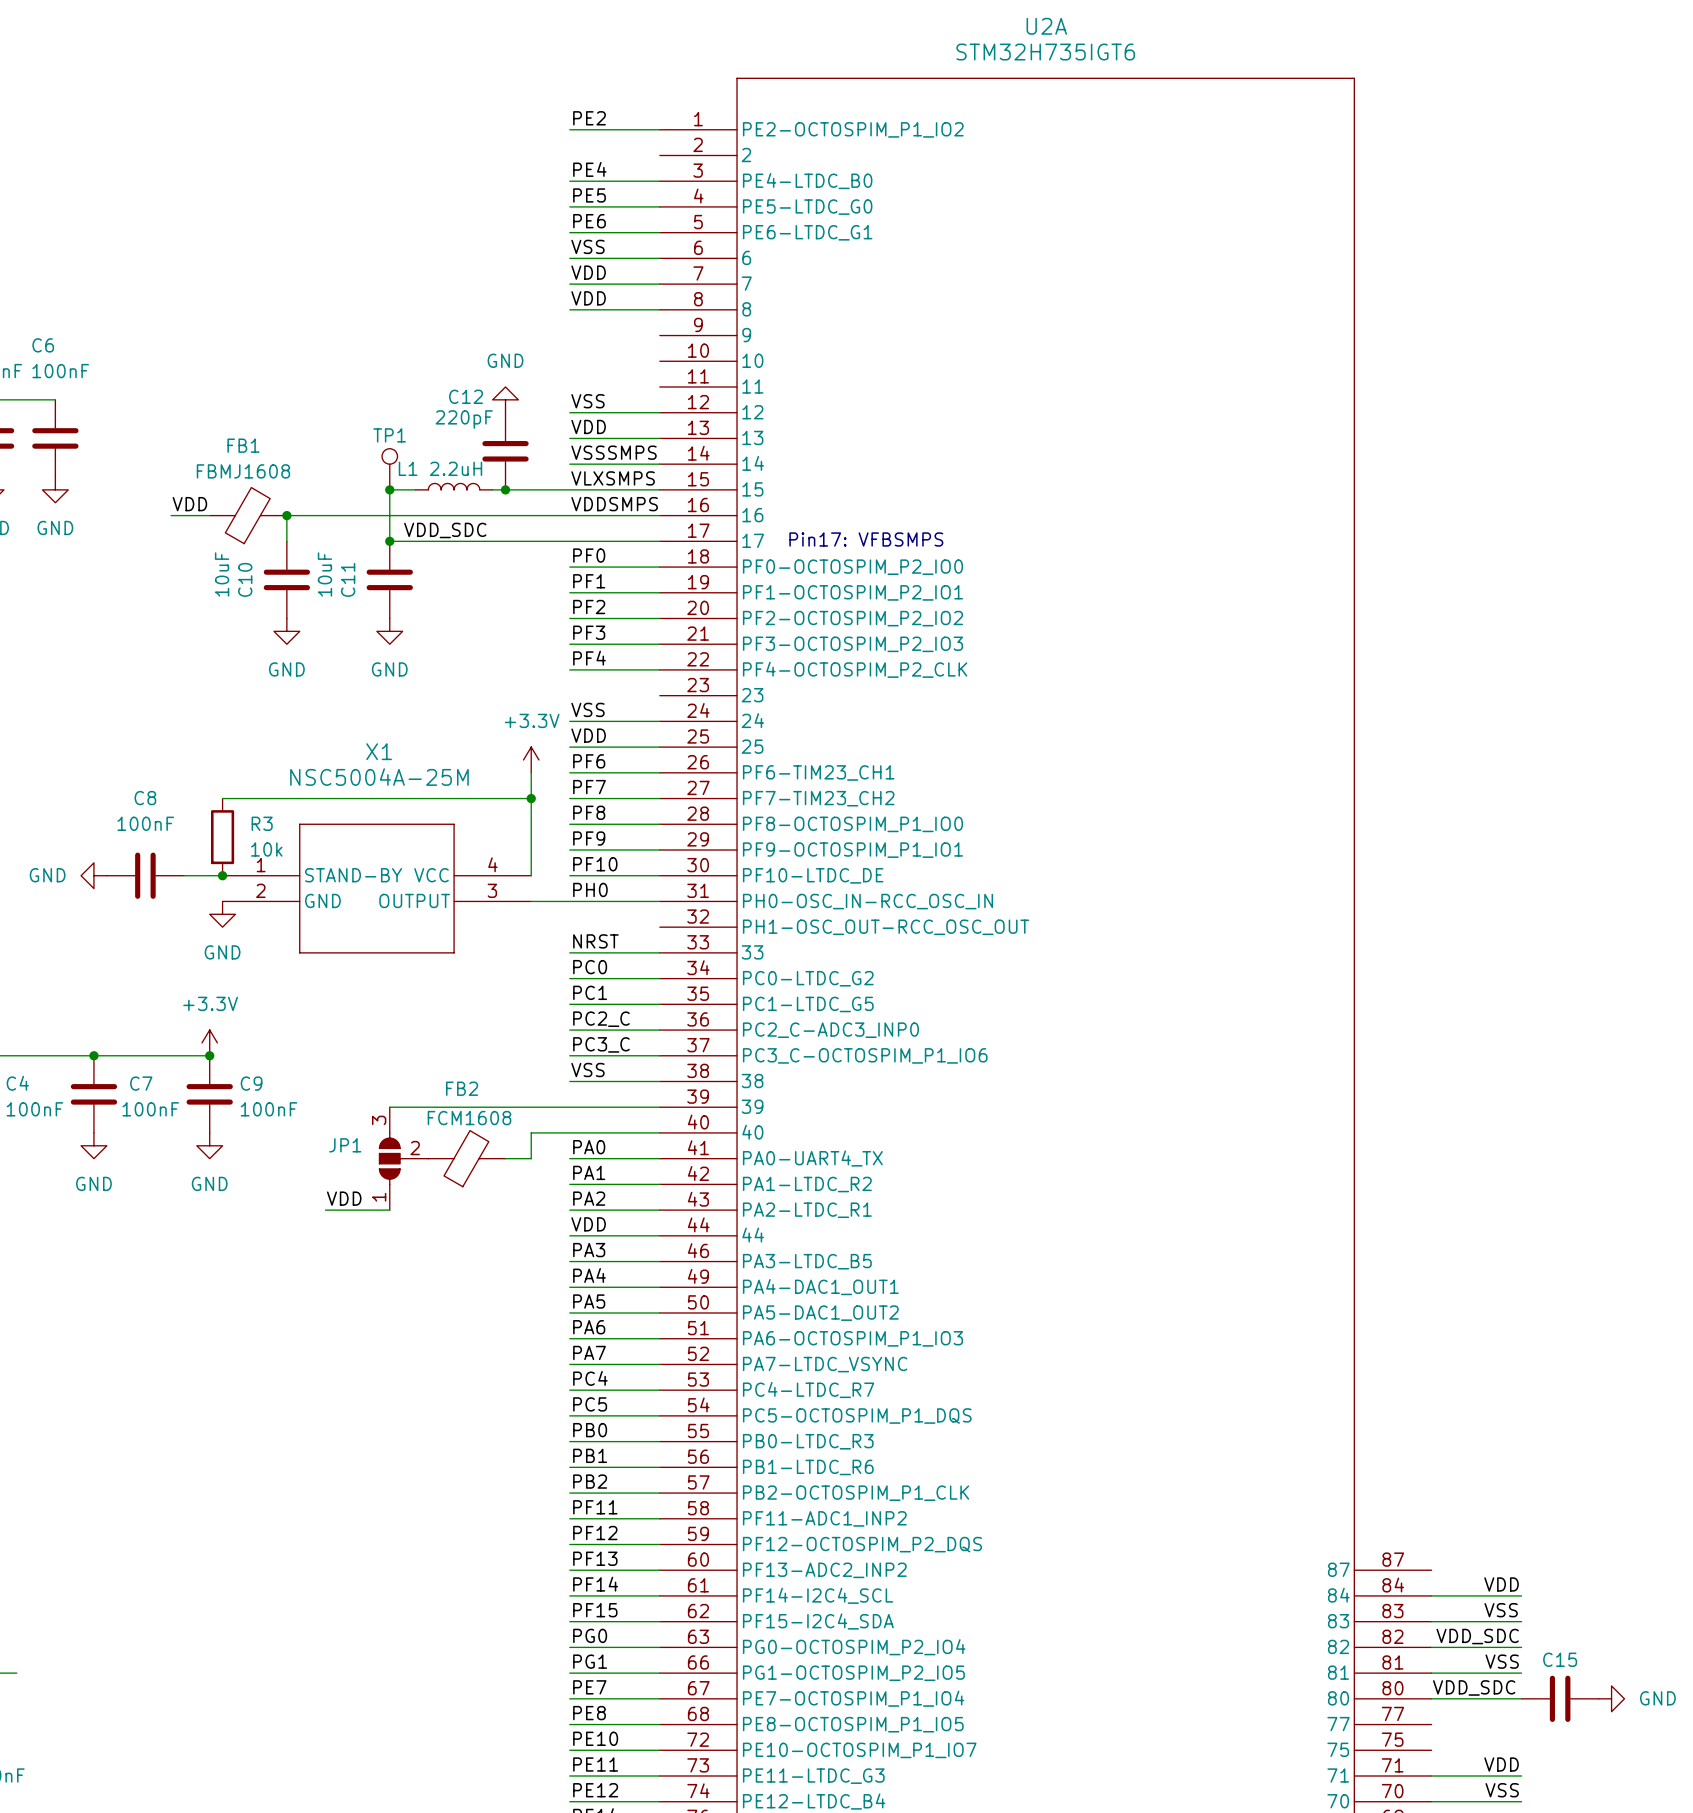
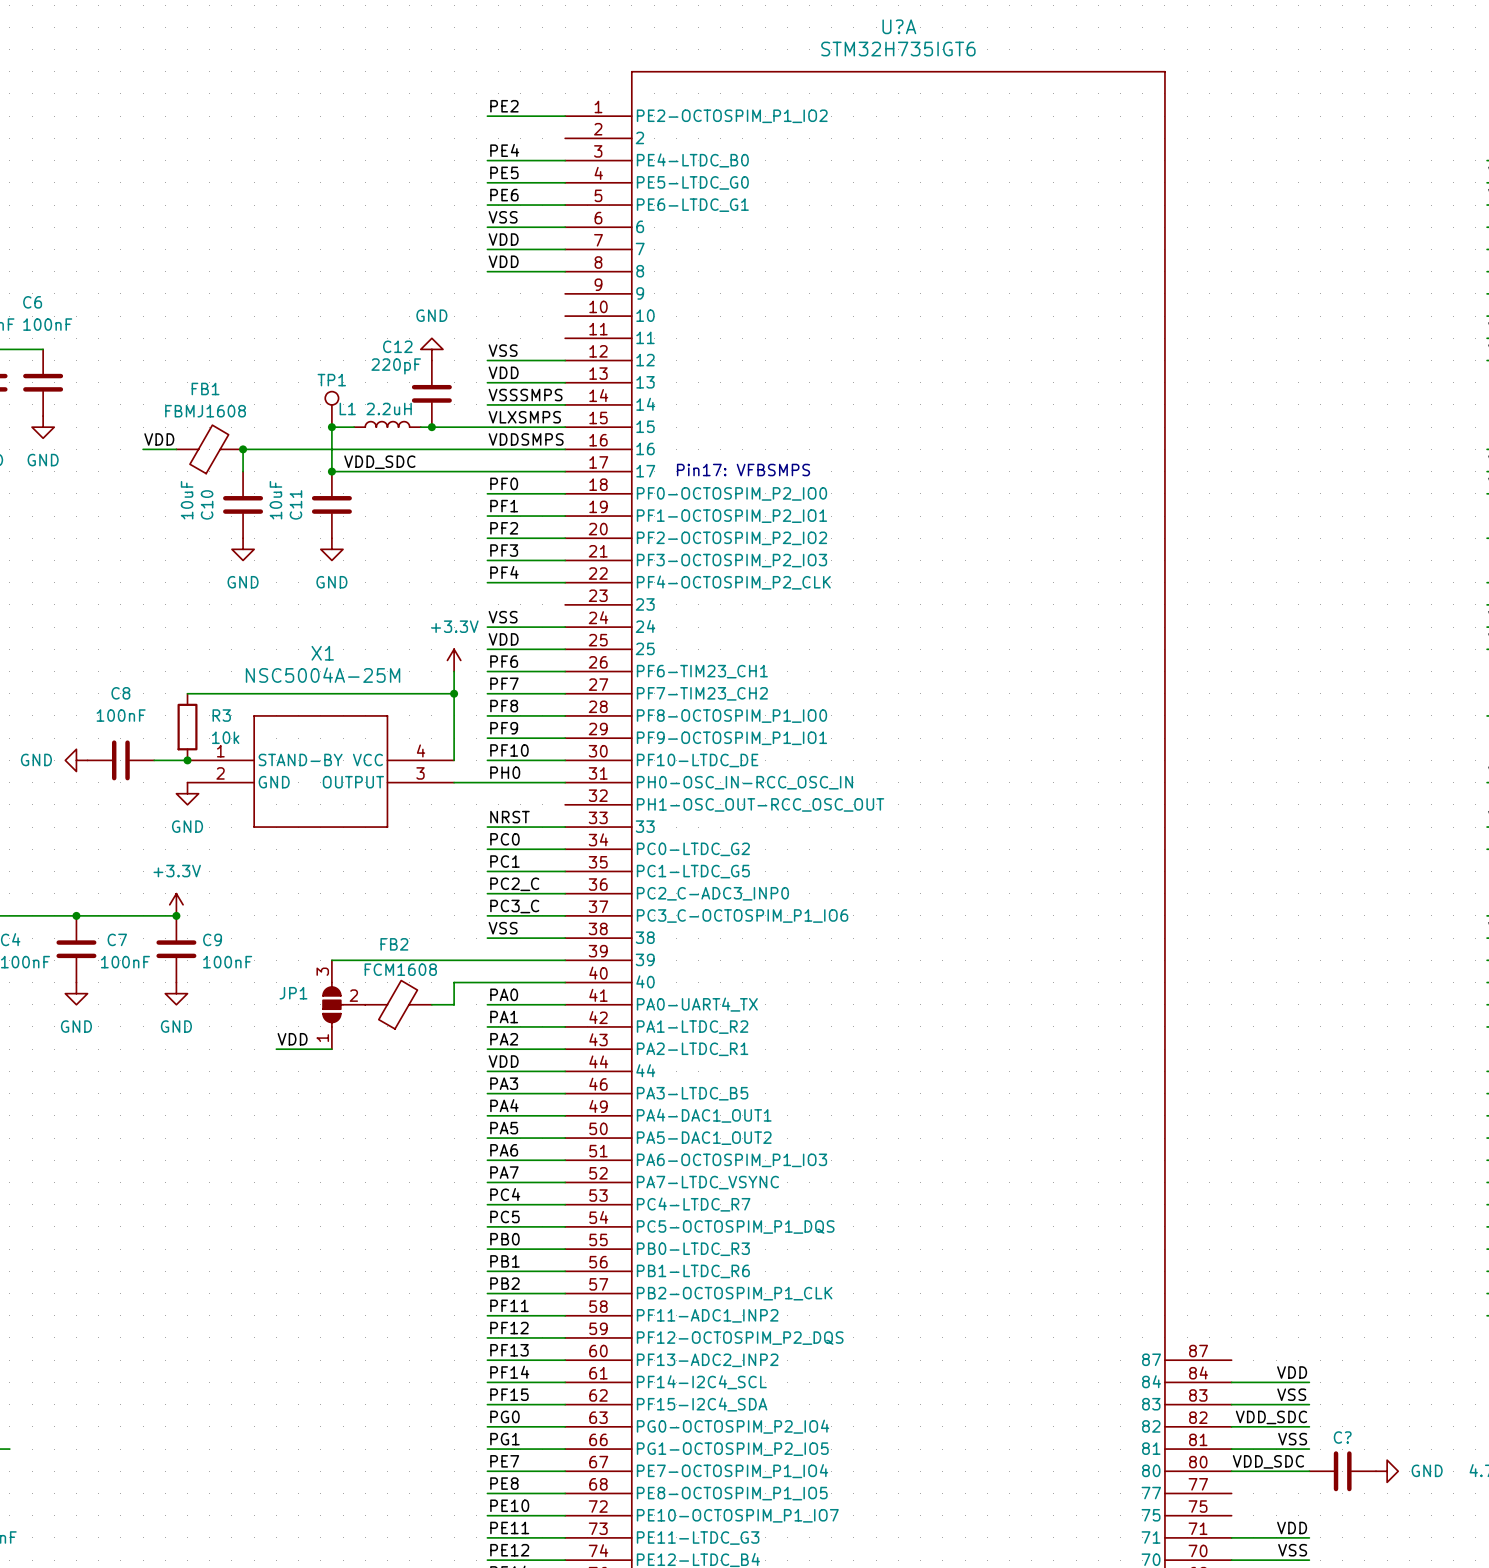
U2A name: U2A (1046, 26) -> U?A (899, 26)
C15 name: C15 (1560, 1659) -> C? (1342, 1437)

